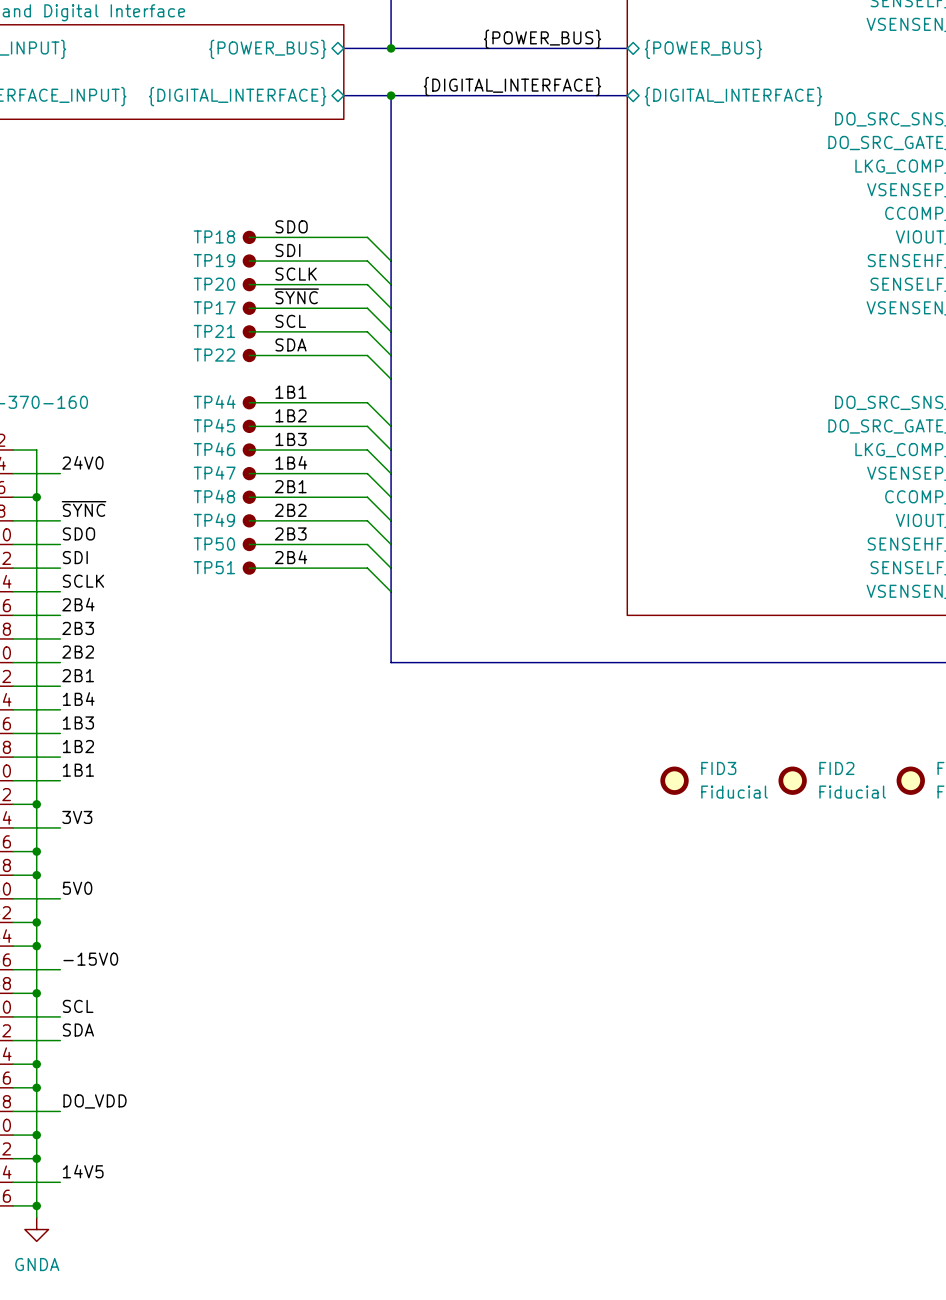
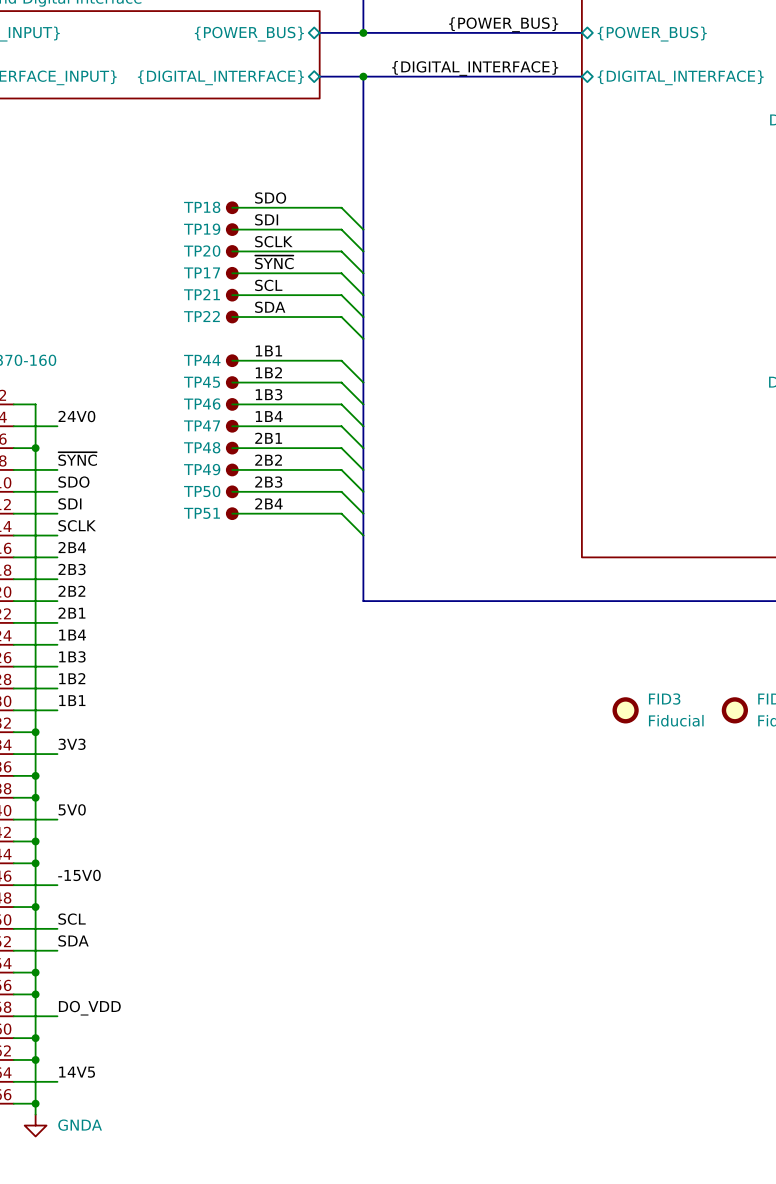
power symbol text position: GNDA (37, 1264) -> GNDA (80, 1125)

